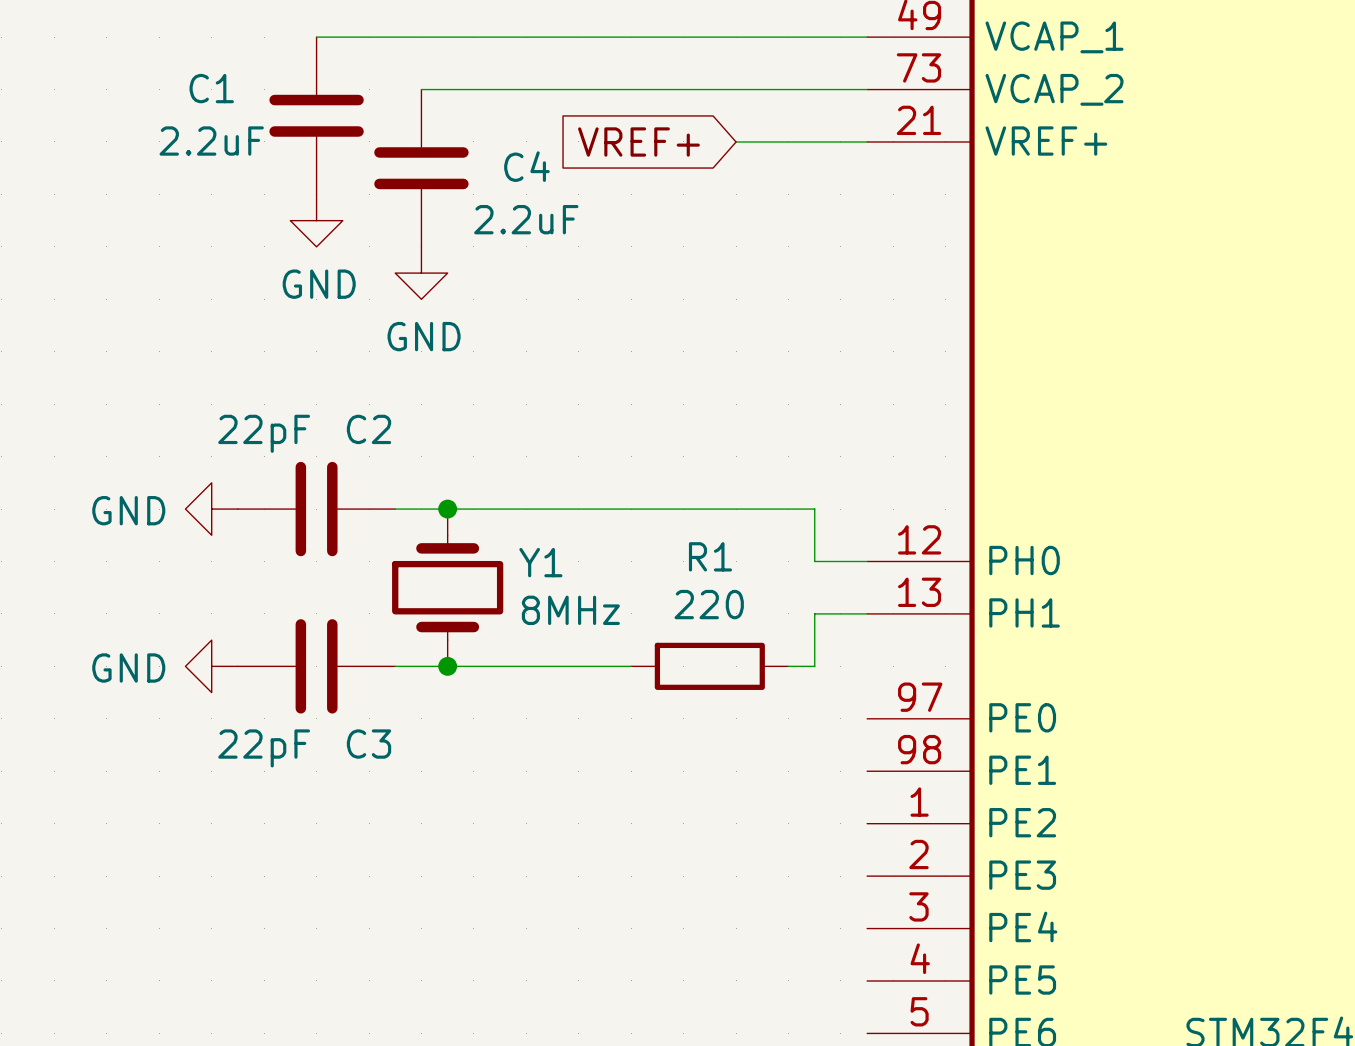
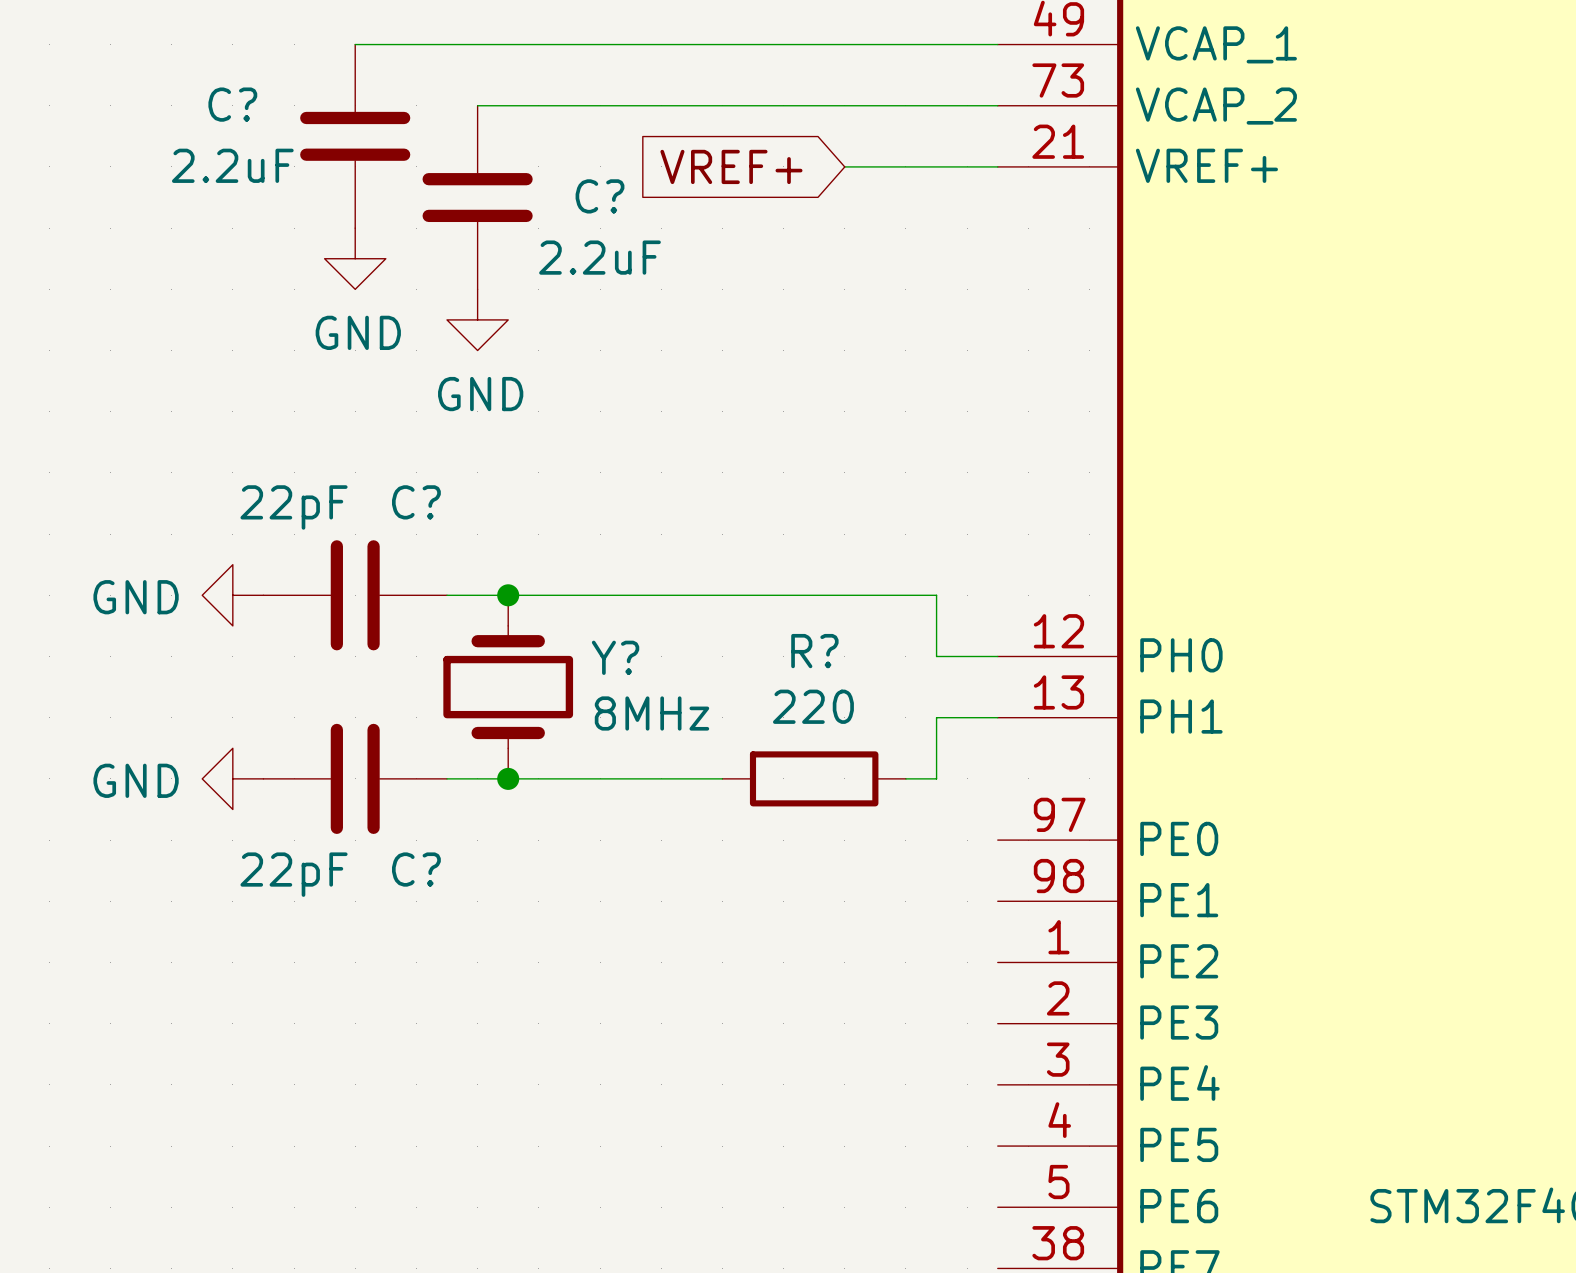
C1 name: C1 (211, 88) -> C? (232, 104)
C4 name: C4 (526, 166) -> C? (600, 196)
C2 name: C2 (369, 429) -> C? (416, 502)
R1 name: R1 (710, 556) -> R? (814, 651)
Y1 name: Y1 (540, 562) -> Y? (615, 657)
C3 name: C3 (369, 744) -> C? (416, 869)

